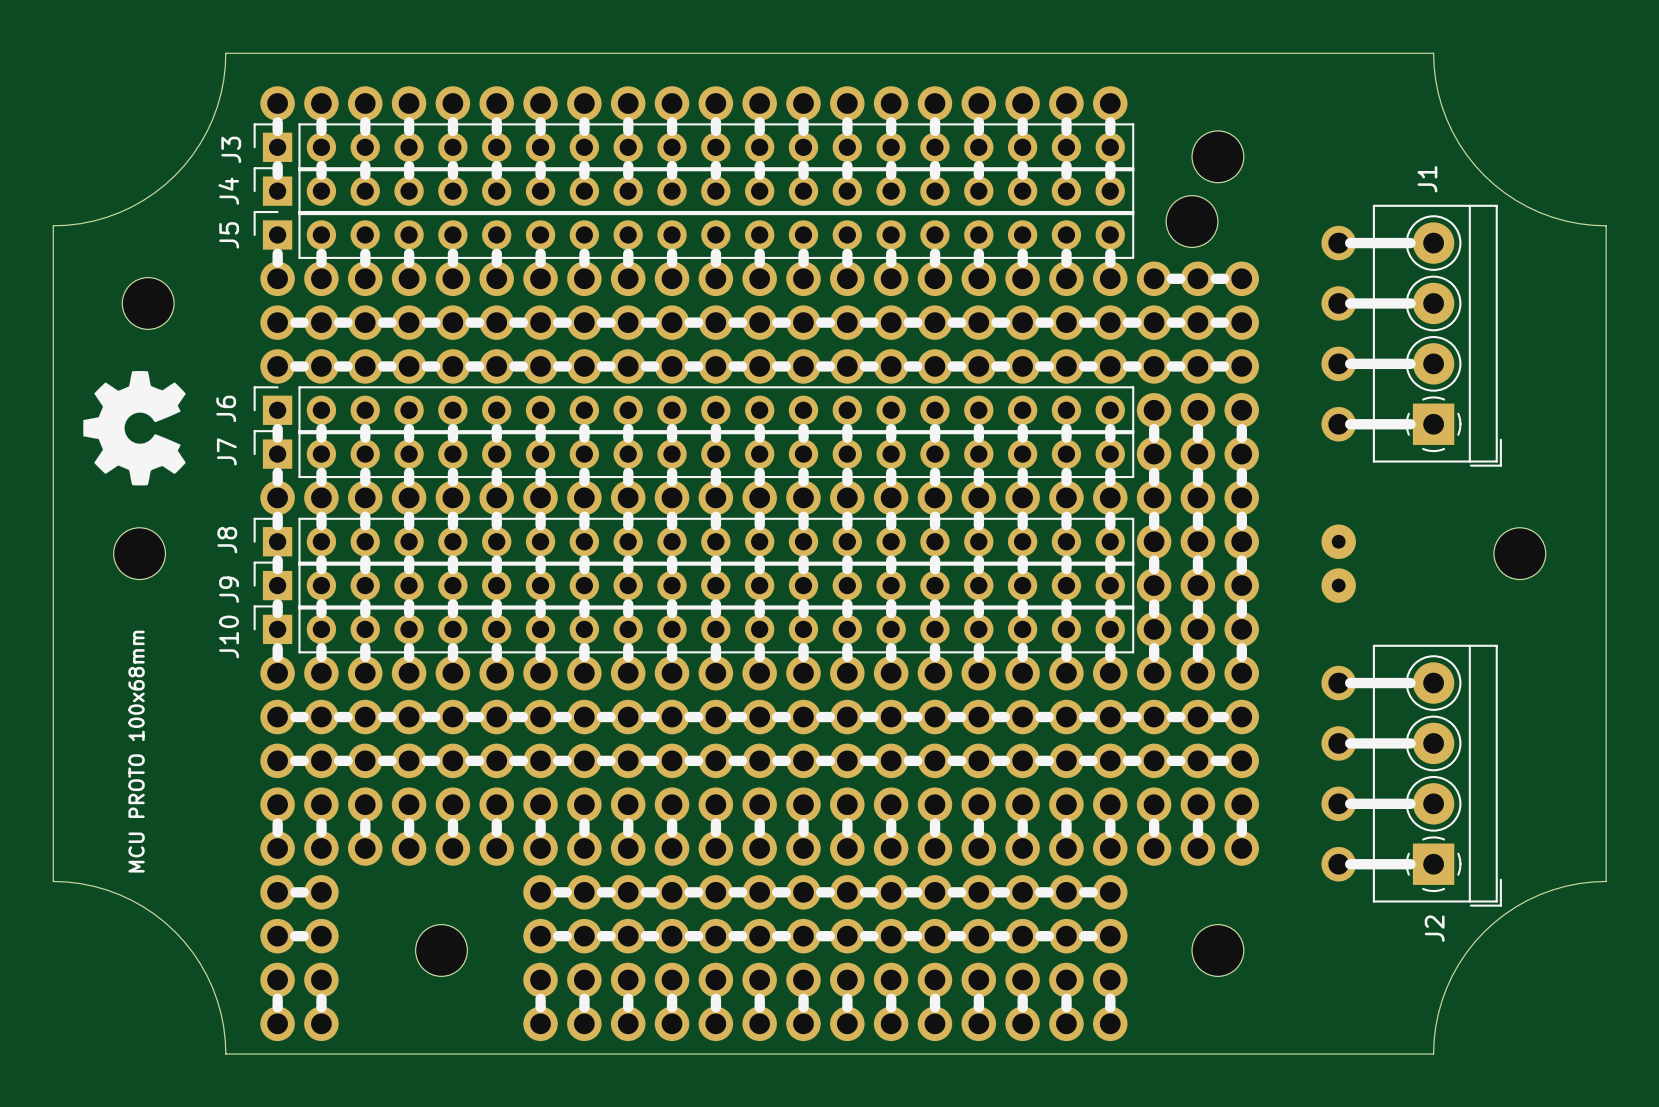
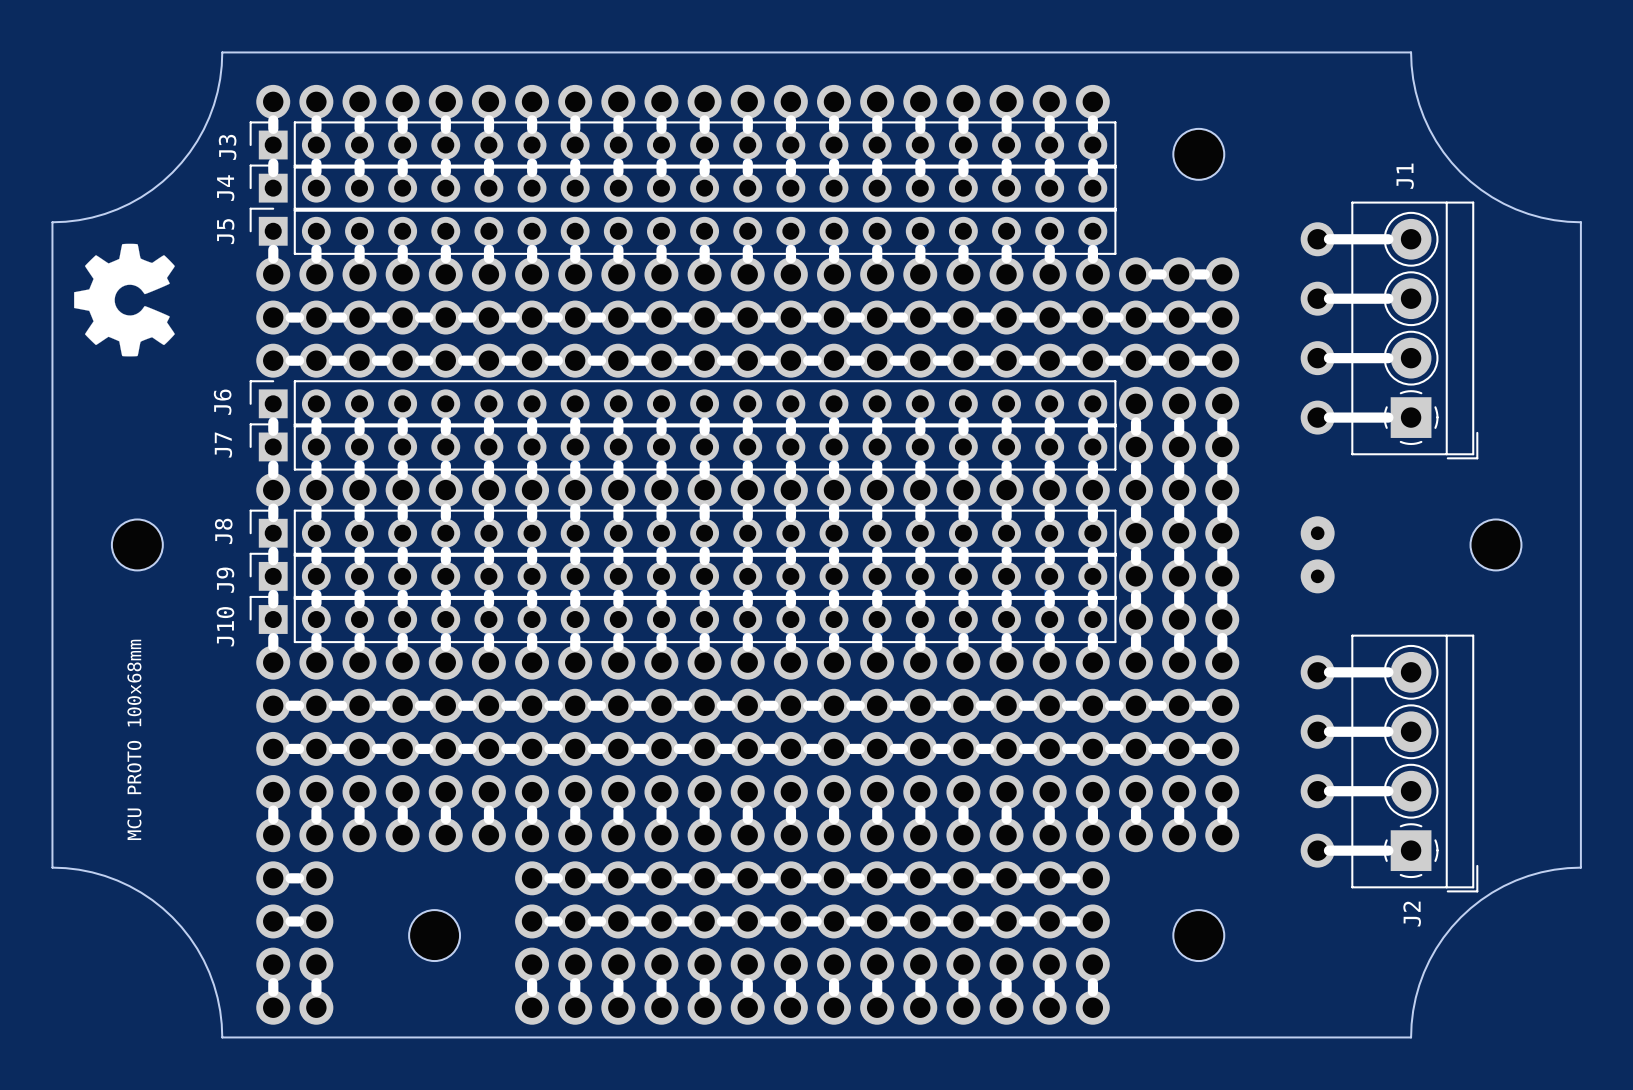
part: (1192, 221) -> none
part: (148, 303) -> none
drawing position: (134, 428) -> (124, 300)

